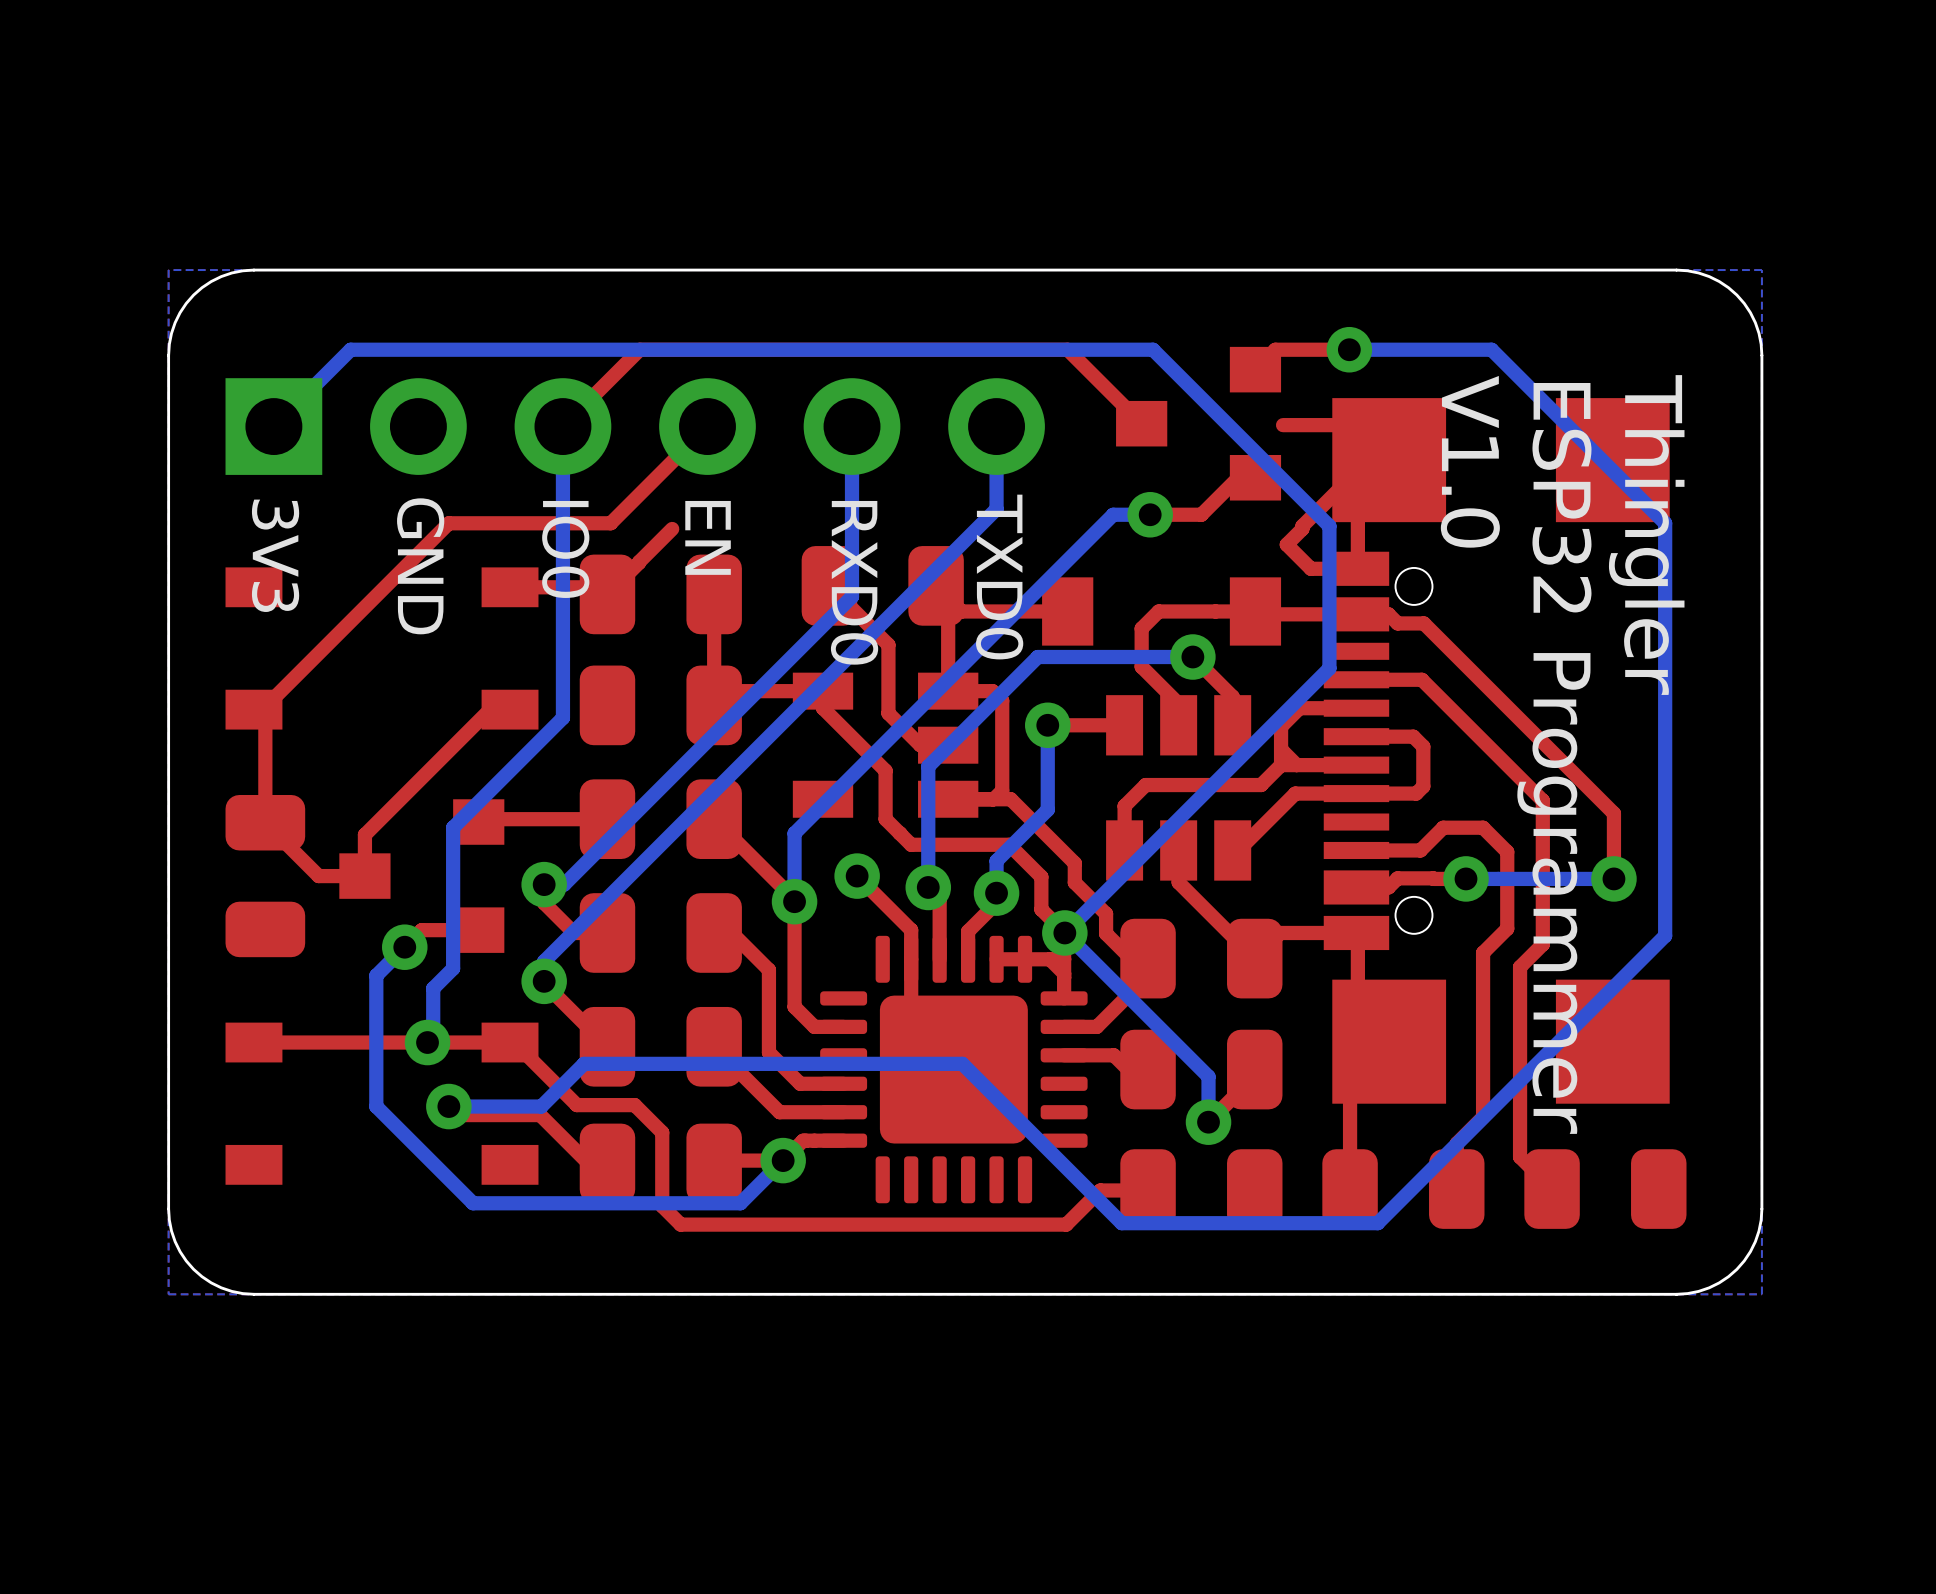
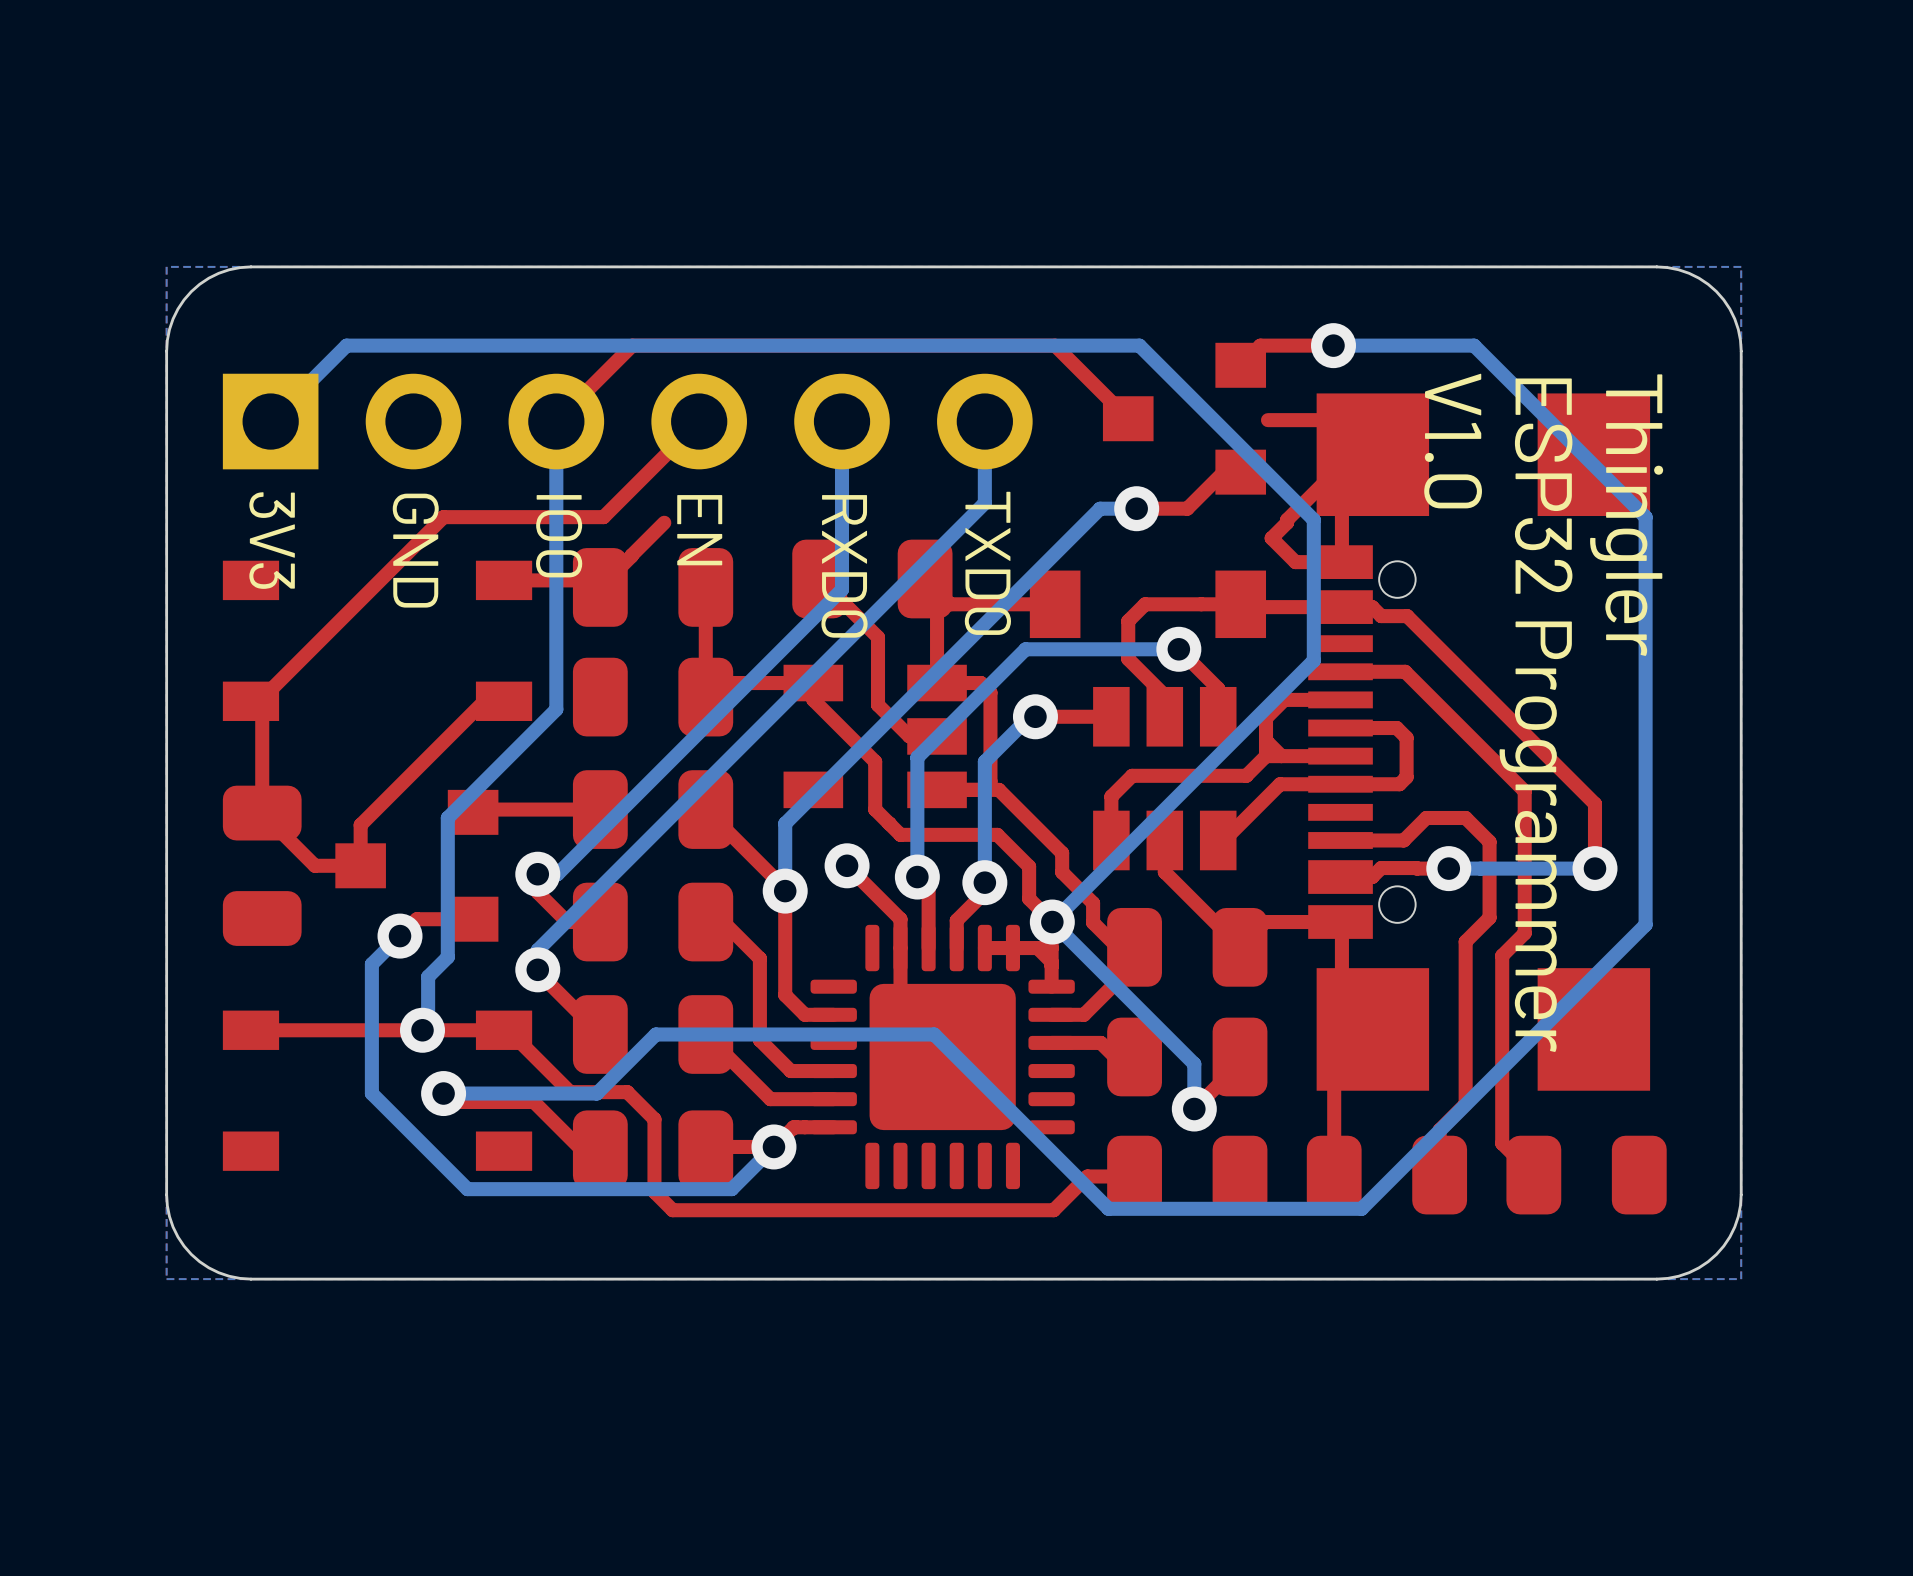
bottom track: (1047, 725) (1047, 809) (996, 860) -> (1035, 716) (1029, 716) (984, 761) (984, 850)
bottom track: (962, 1063) (584, 1063) (541, 1106) -> (951, 1051) (934, 1034) (655, 1034) (596, 1093) (534, 1093)

